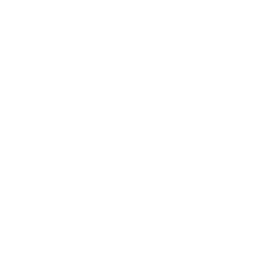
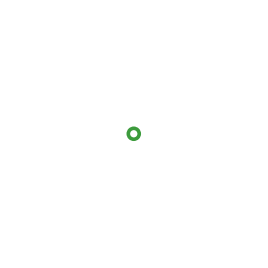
via: none -> (133, 133)

